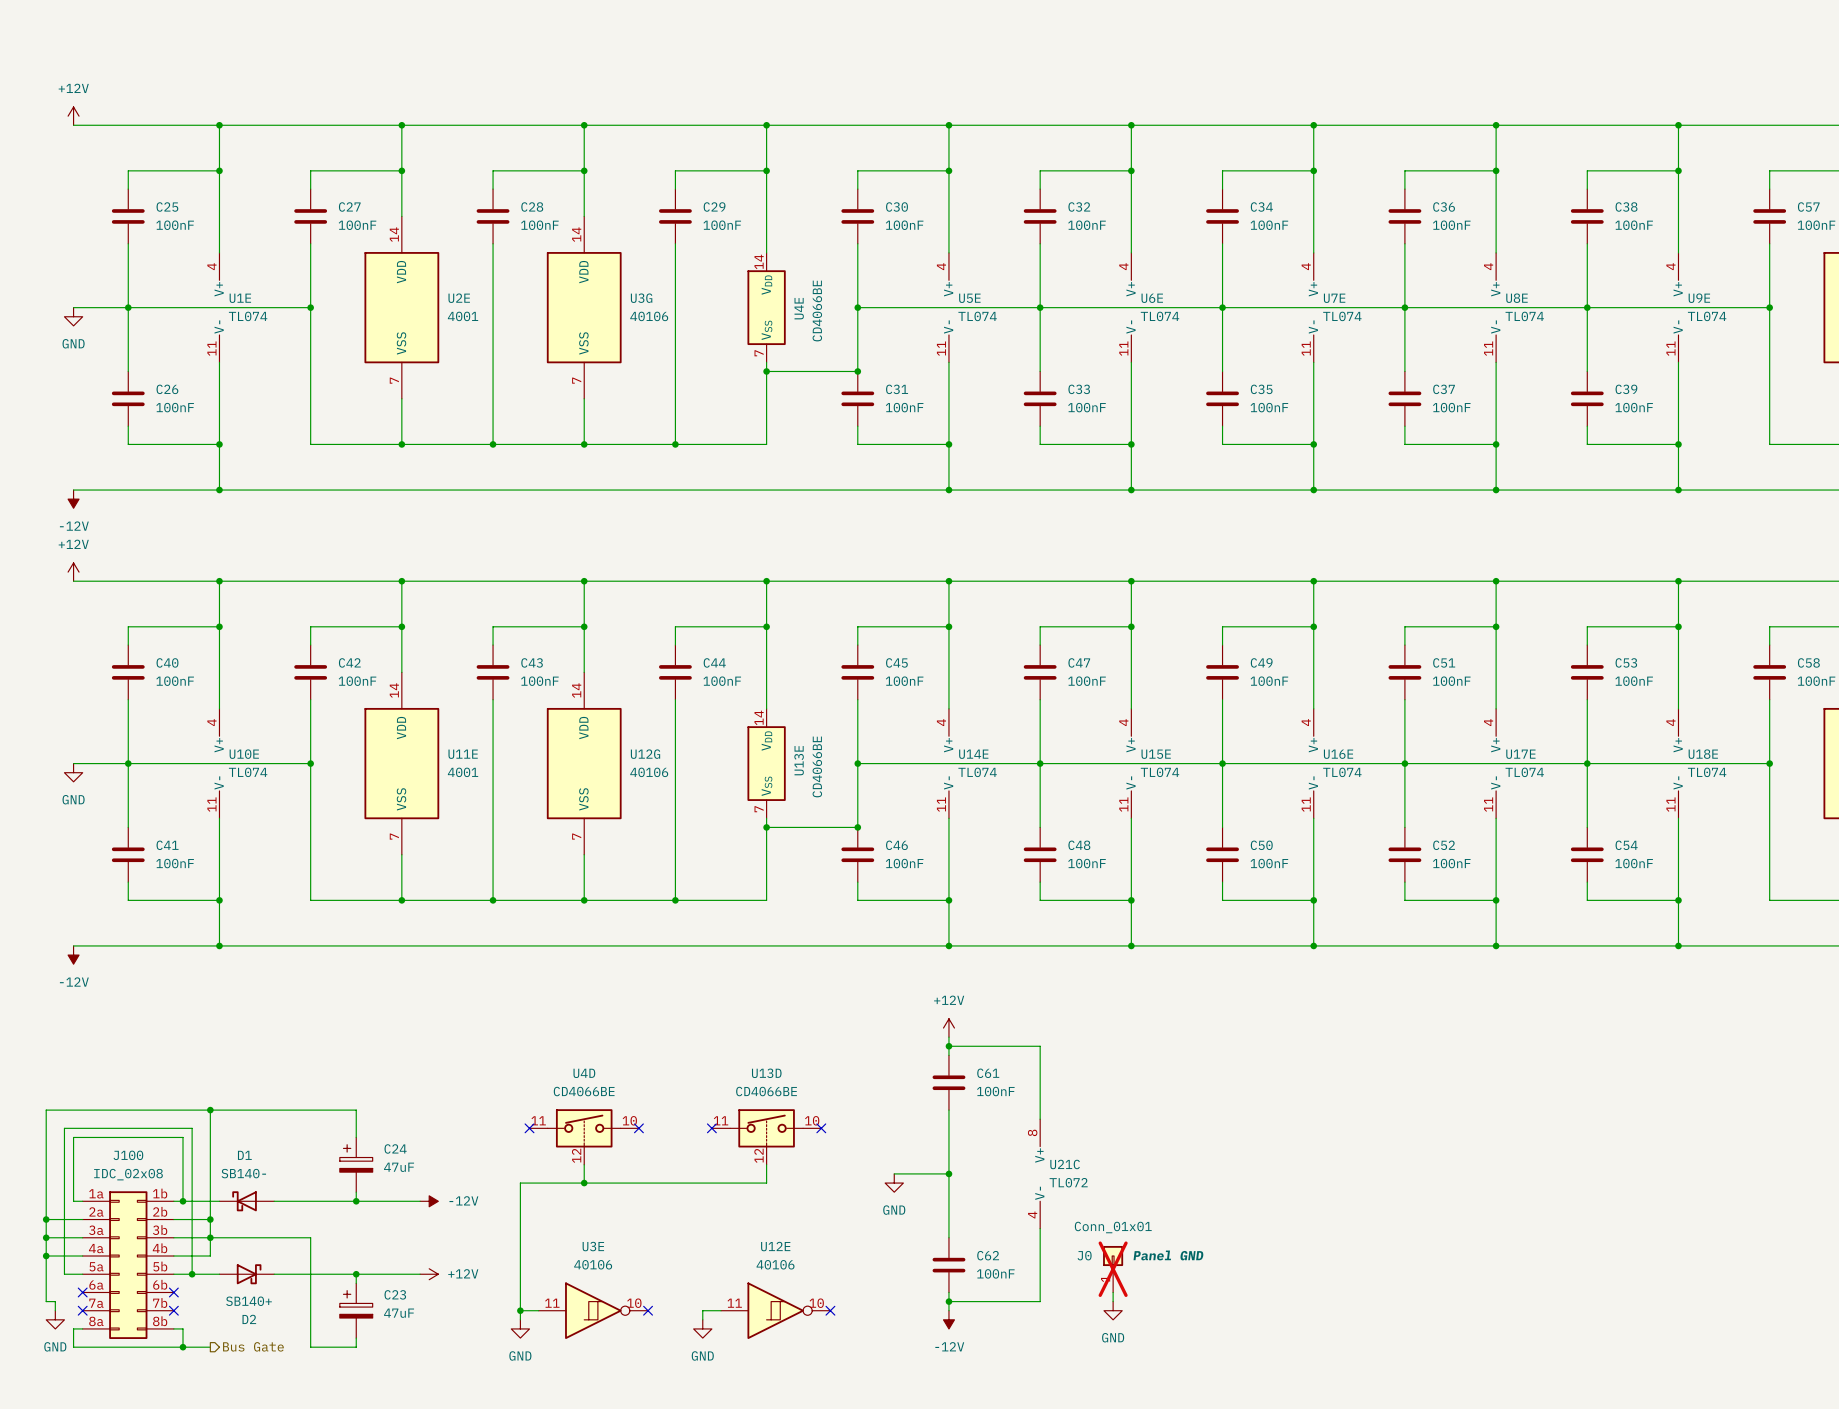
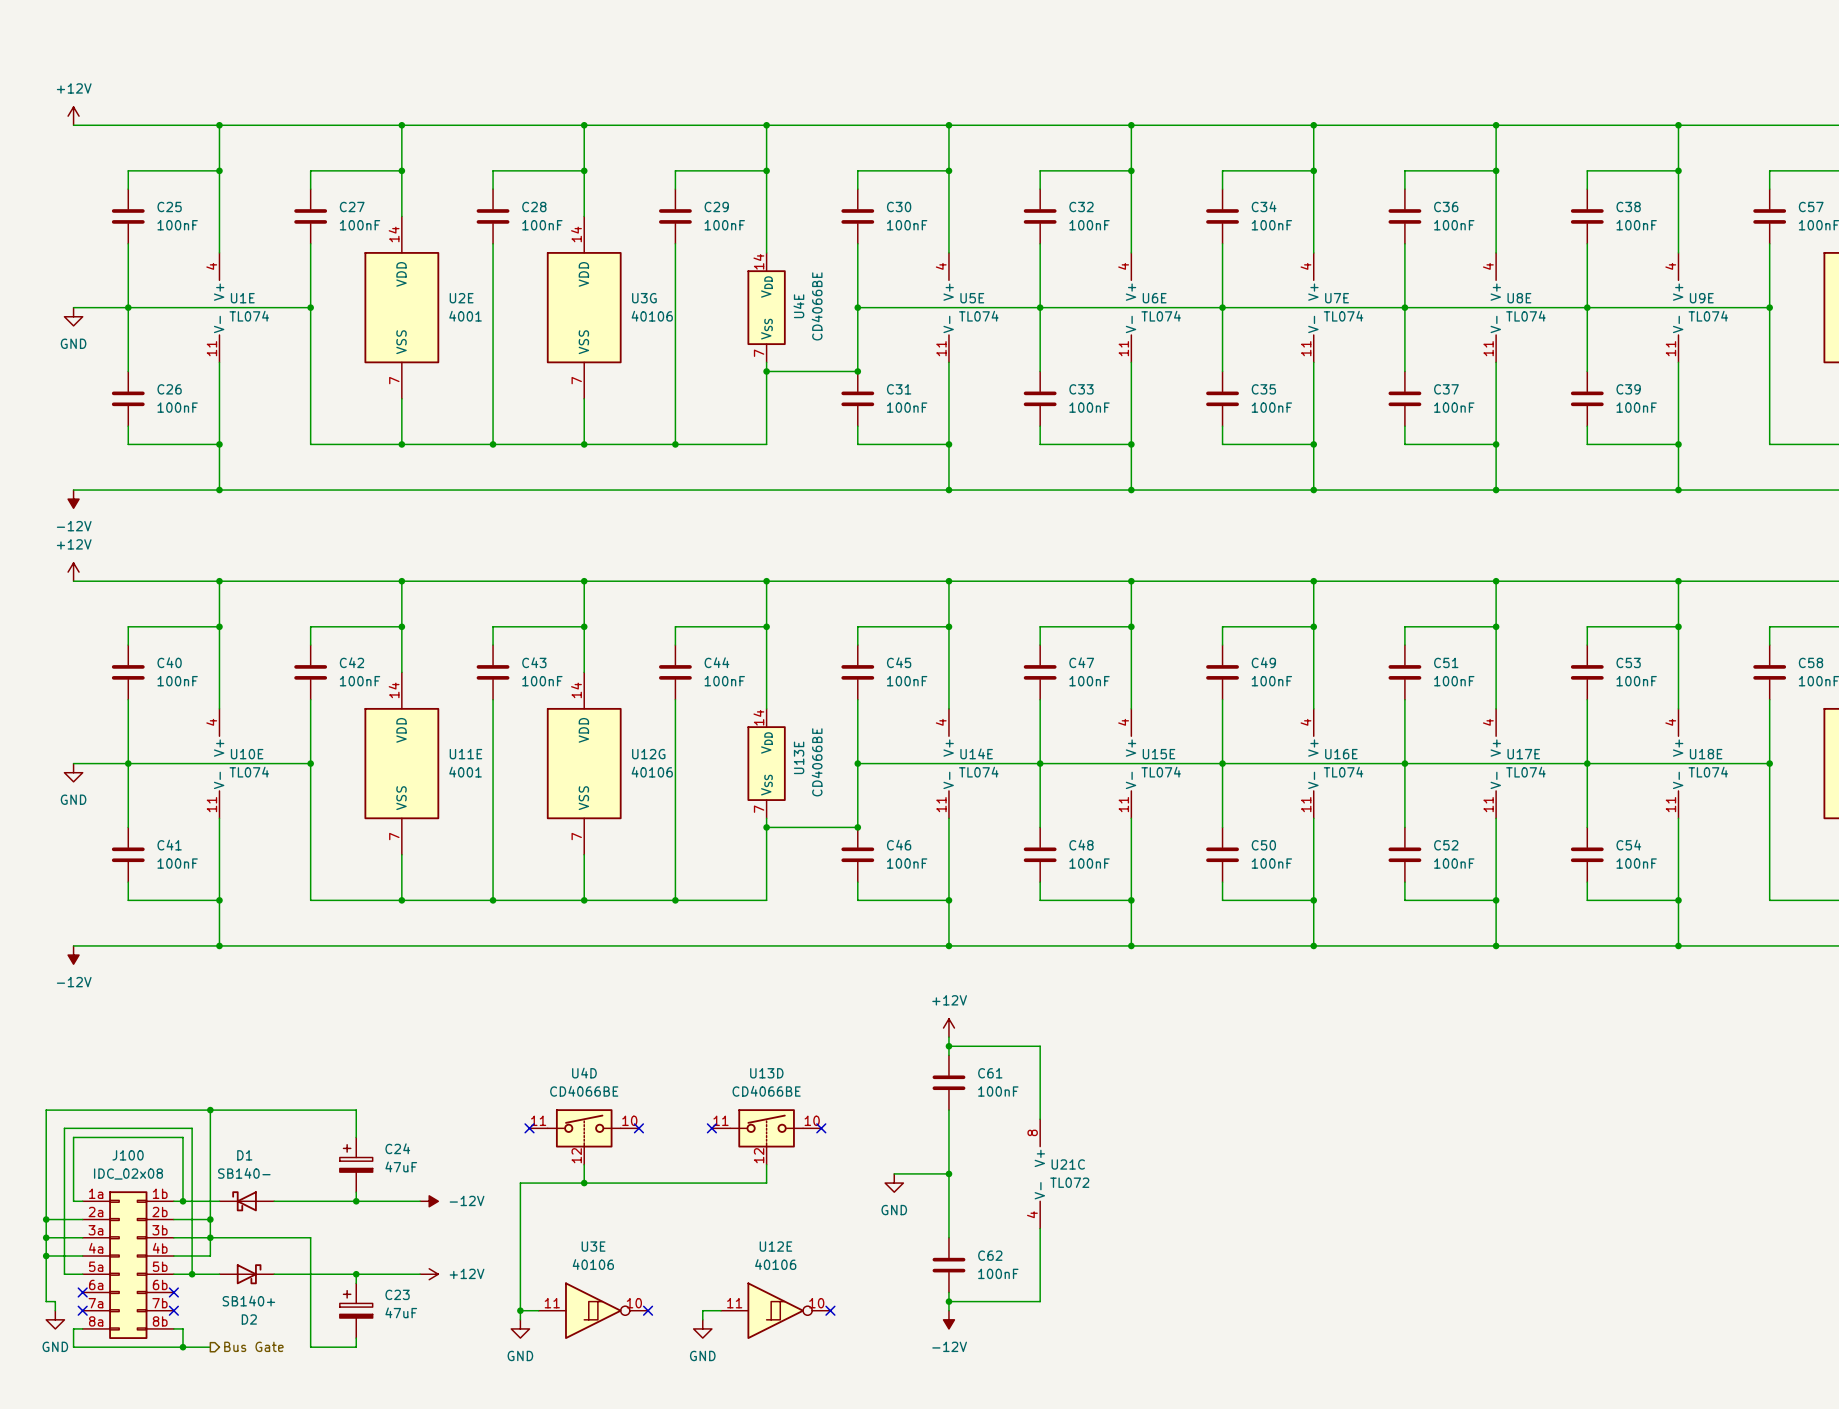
J0: Conn_01x01 (1113, 1269) -> none
wire: (1113, 1292) (1113, 1301) -> none
power symbol: GND (1113, 1310) -> none

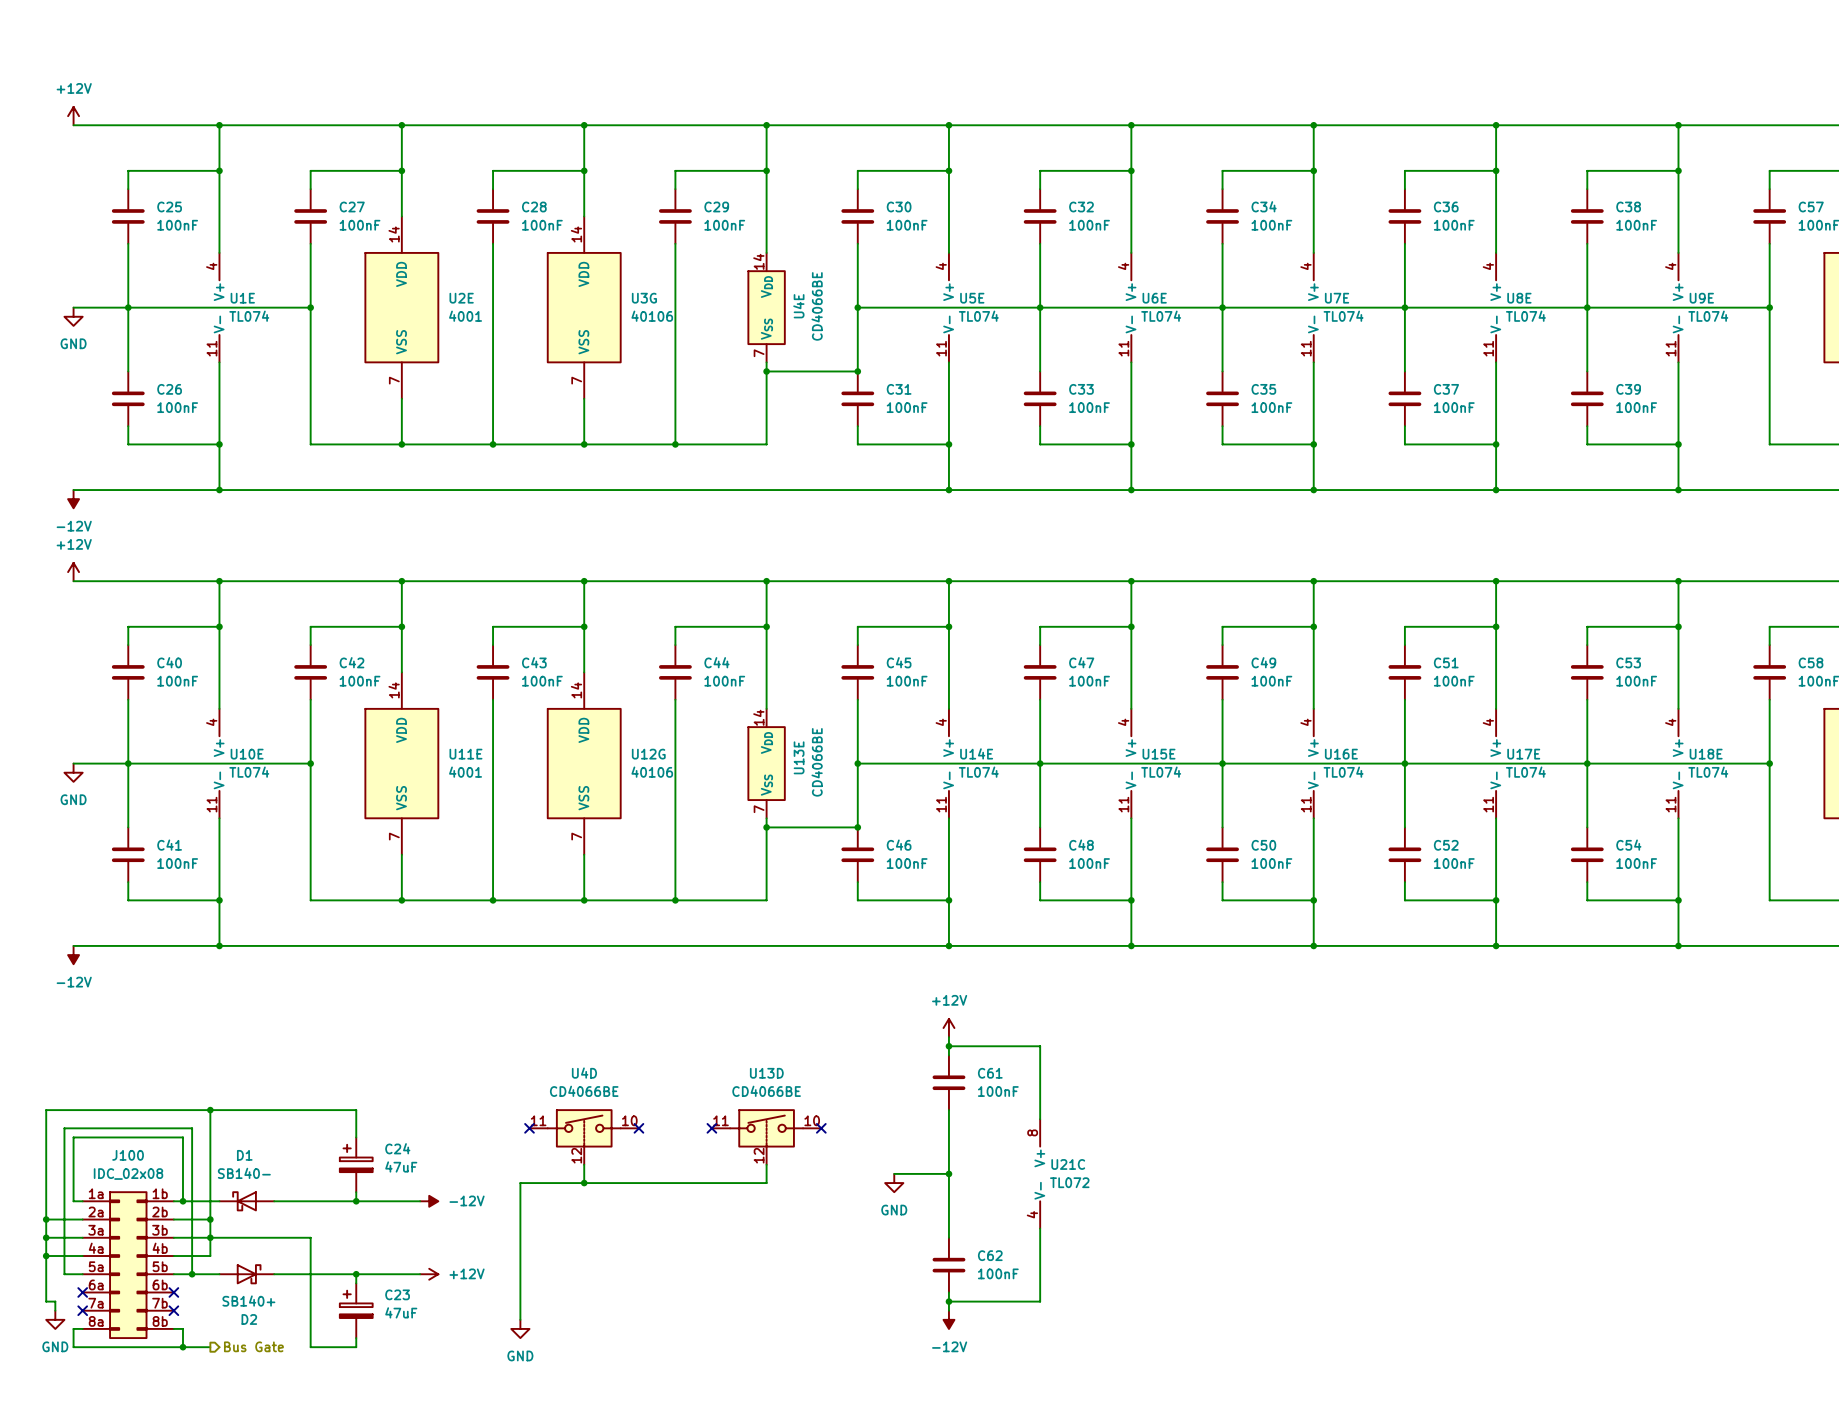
wire: (520, 1310) (538, 1310) -> none
junction: (520, 1310) -> none
U3E: 40106 (593, 1310) -> none
no-connect mark: (648, 1310) -> none
wire: (721, 1310) (702, 1310) (702, 1319) -> none
U12E: 40106 (775, 1310) -> none
no-connect mark: (830, 1310) -> none
power symbol: GND (702, 1328) -> none

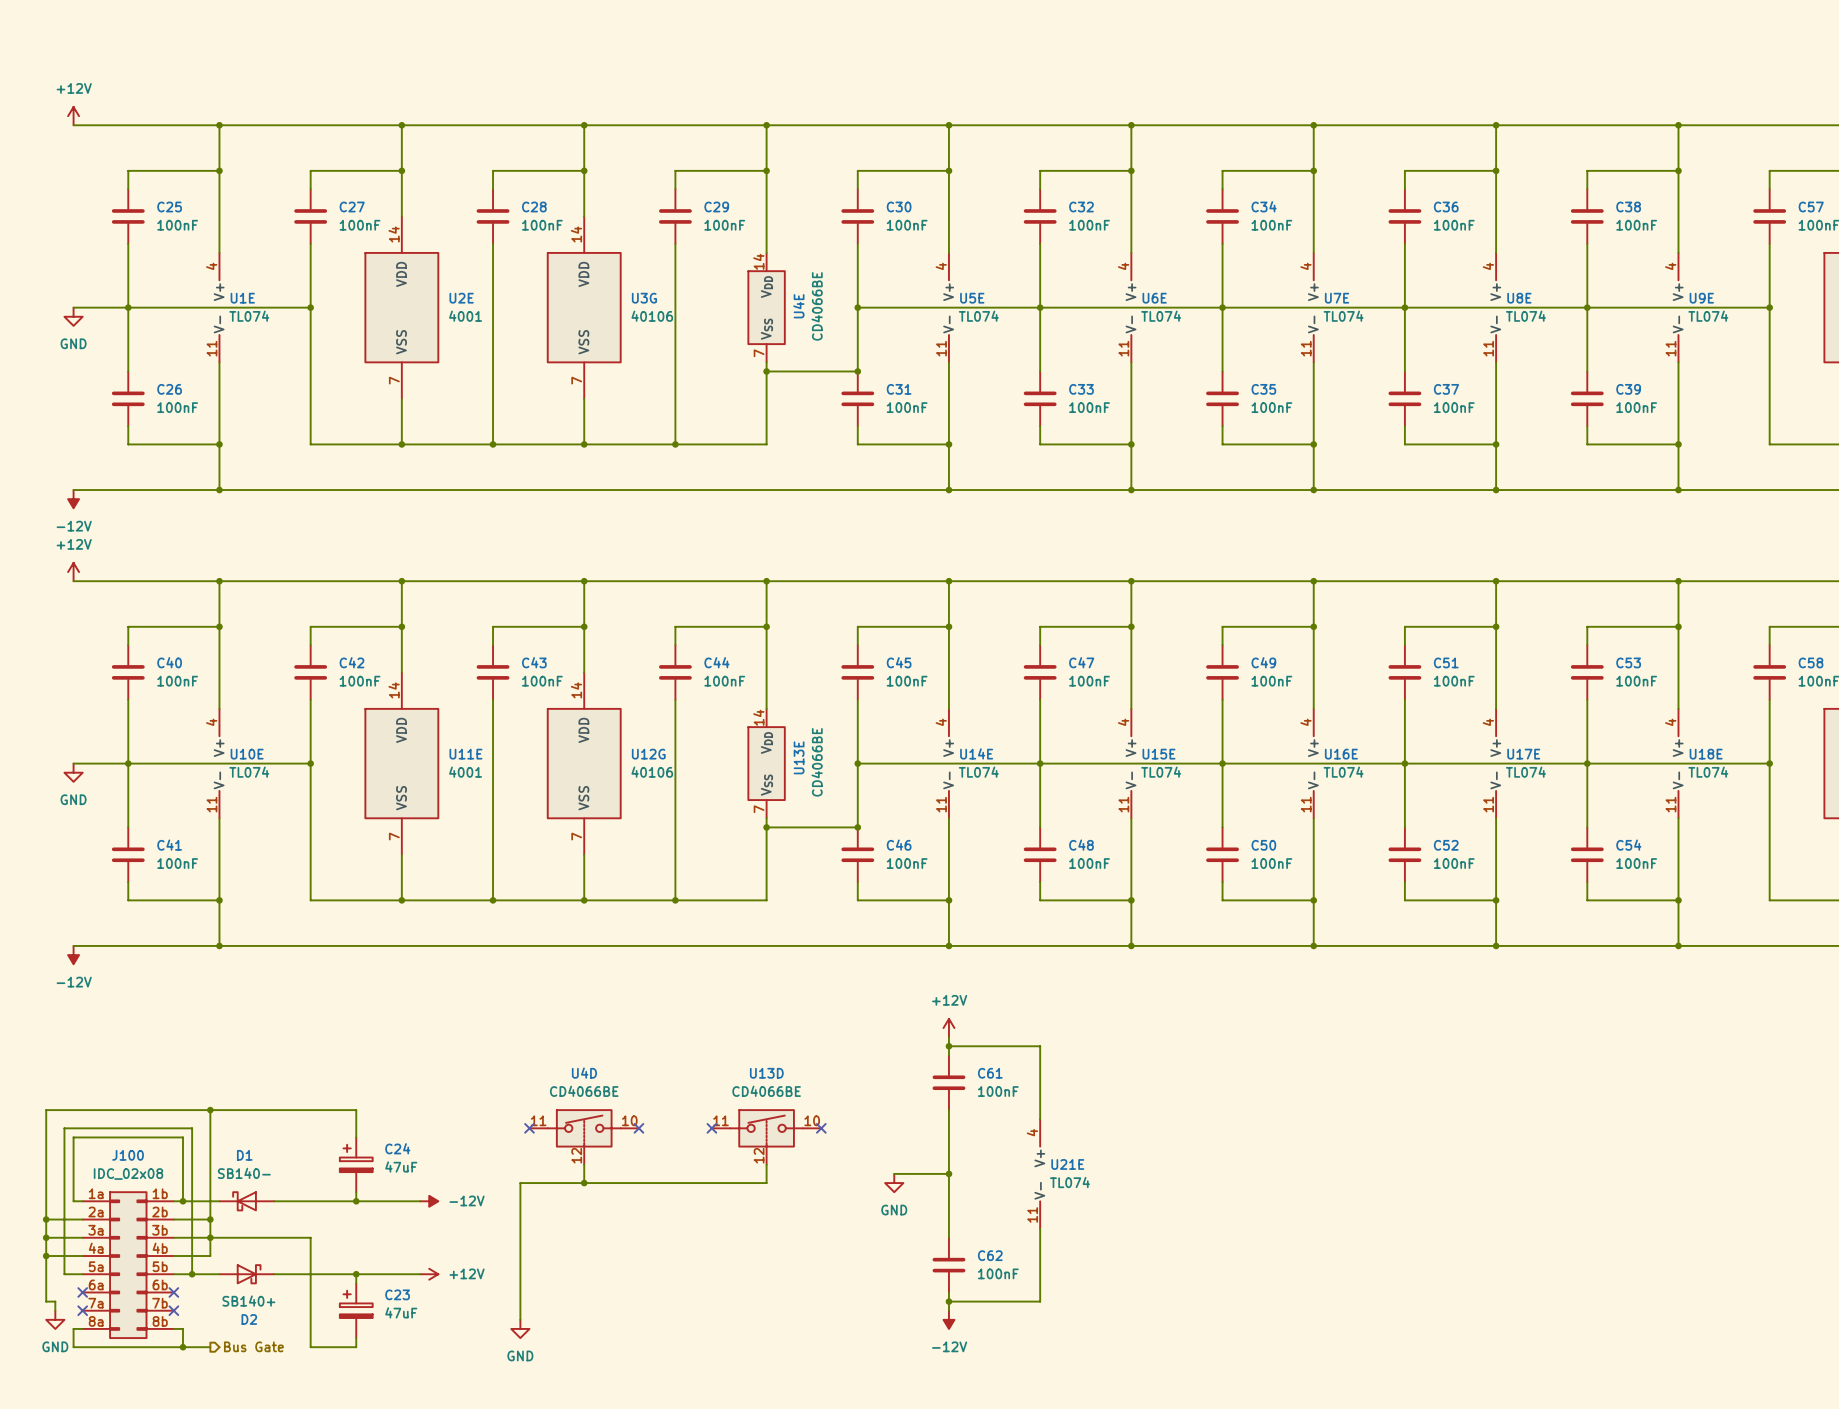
U21C pin number: 8 (1032, 1132) -> 4 (1032, 1132)
U21C name: U21C (1068, 1164) -> U21E (1067, 1164)
U21C value: TL072 (1069, 1182) -> TL074 (1069, 1182)
U21C pin number: 4 (1032, 1214) -> 11 (1032, 1214)

